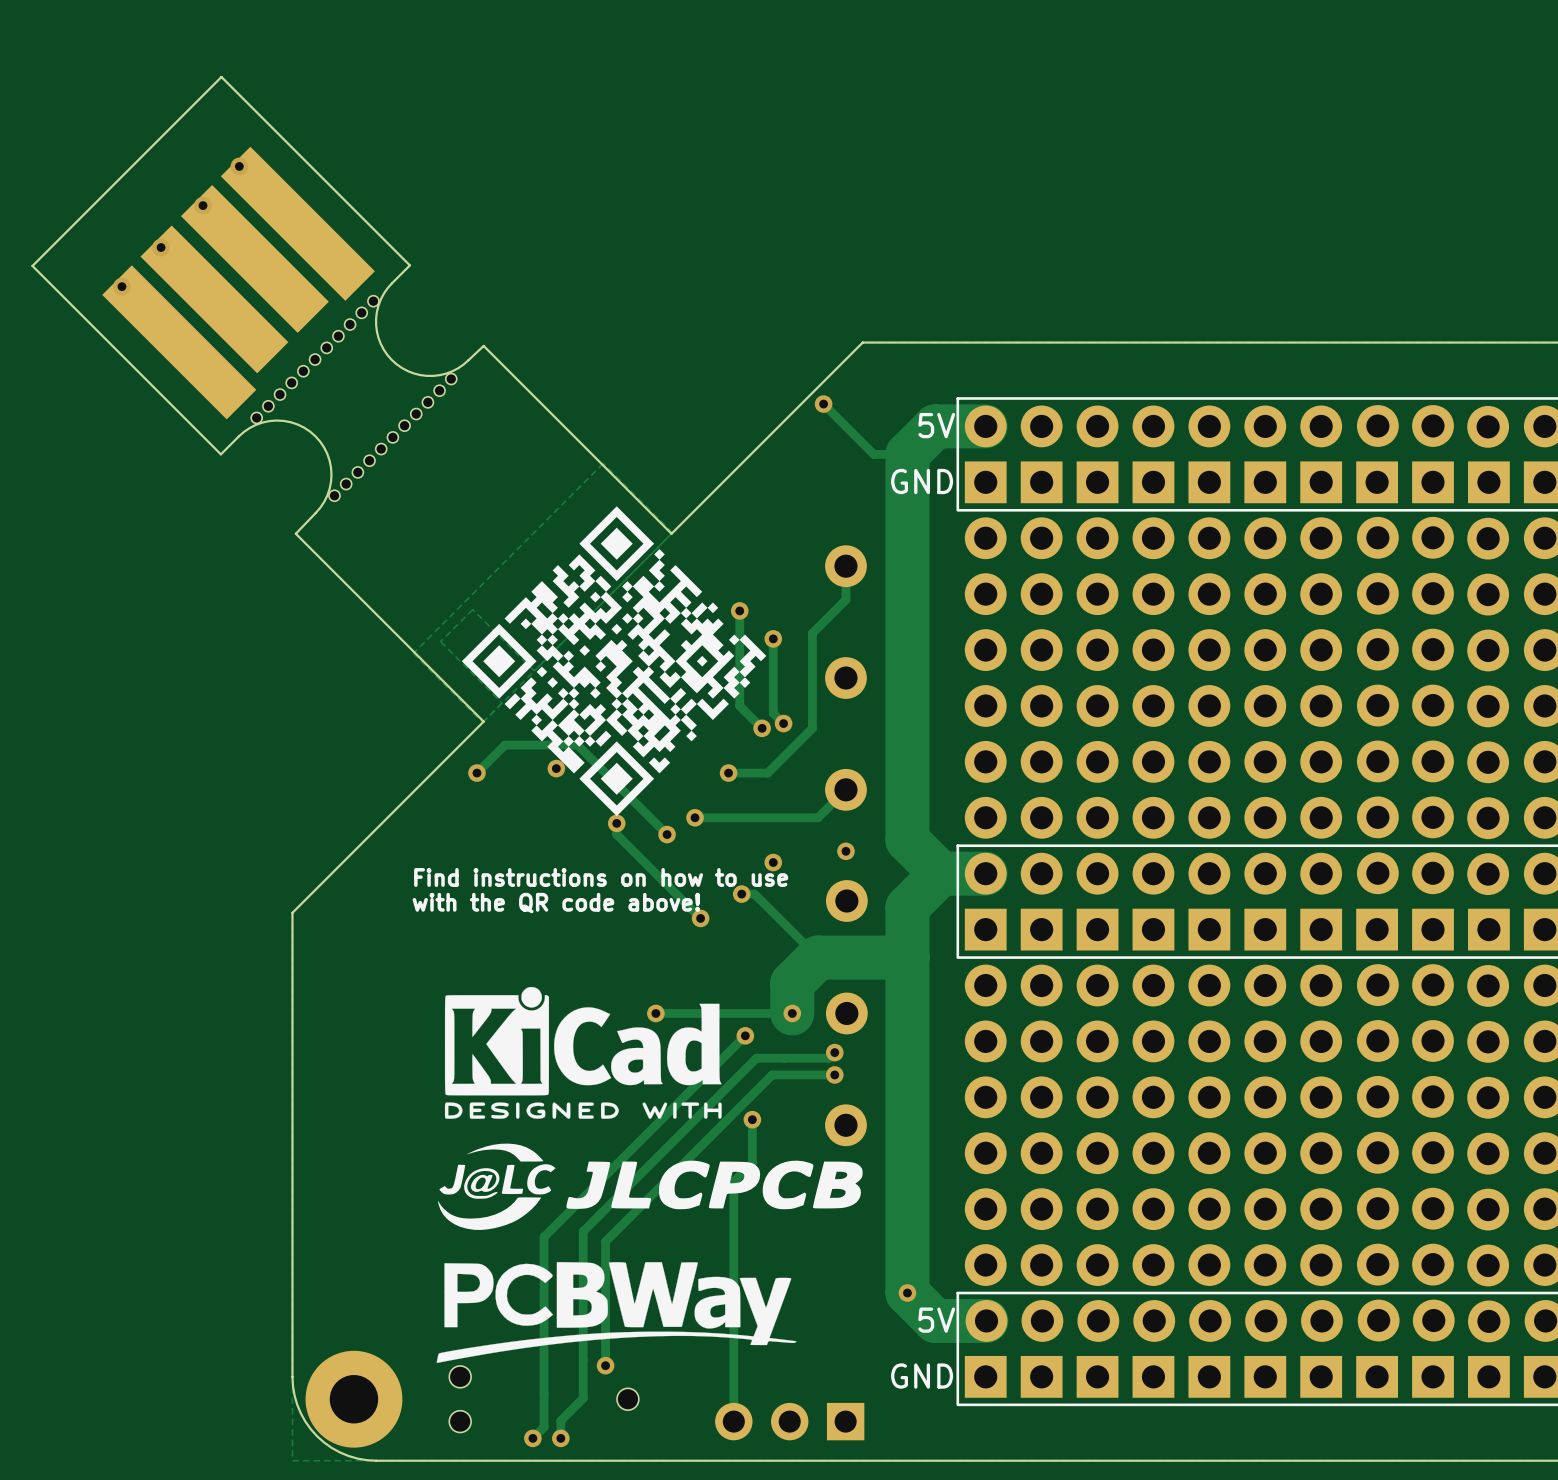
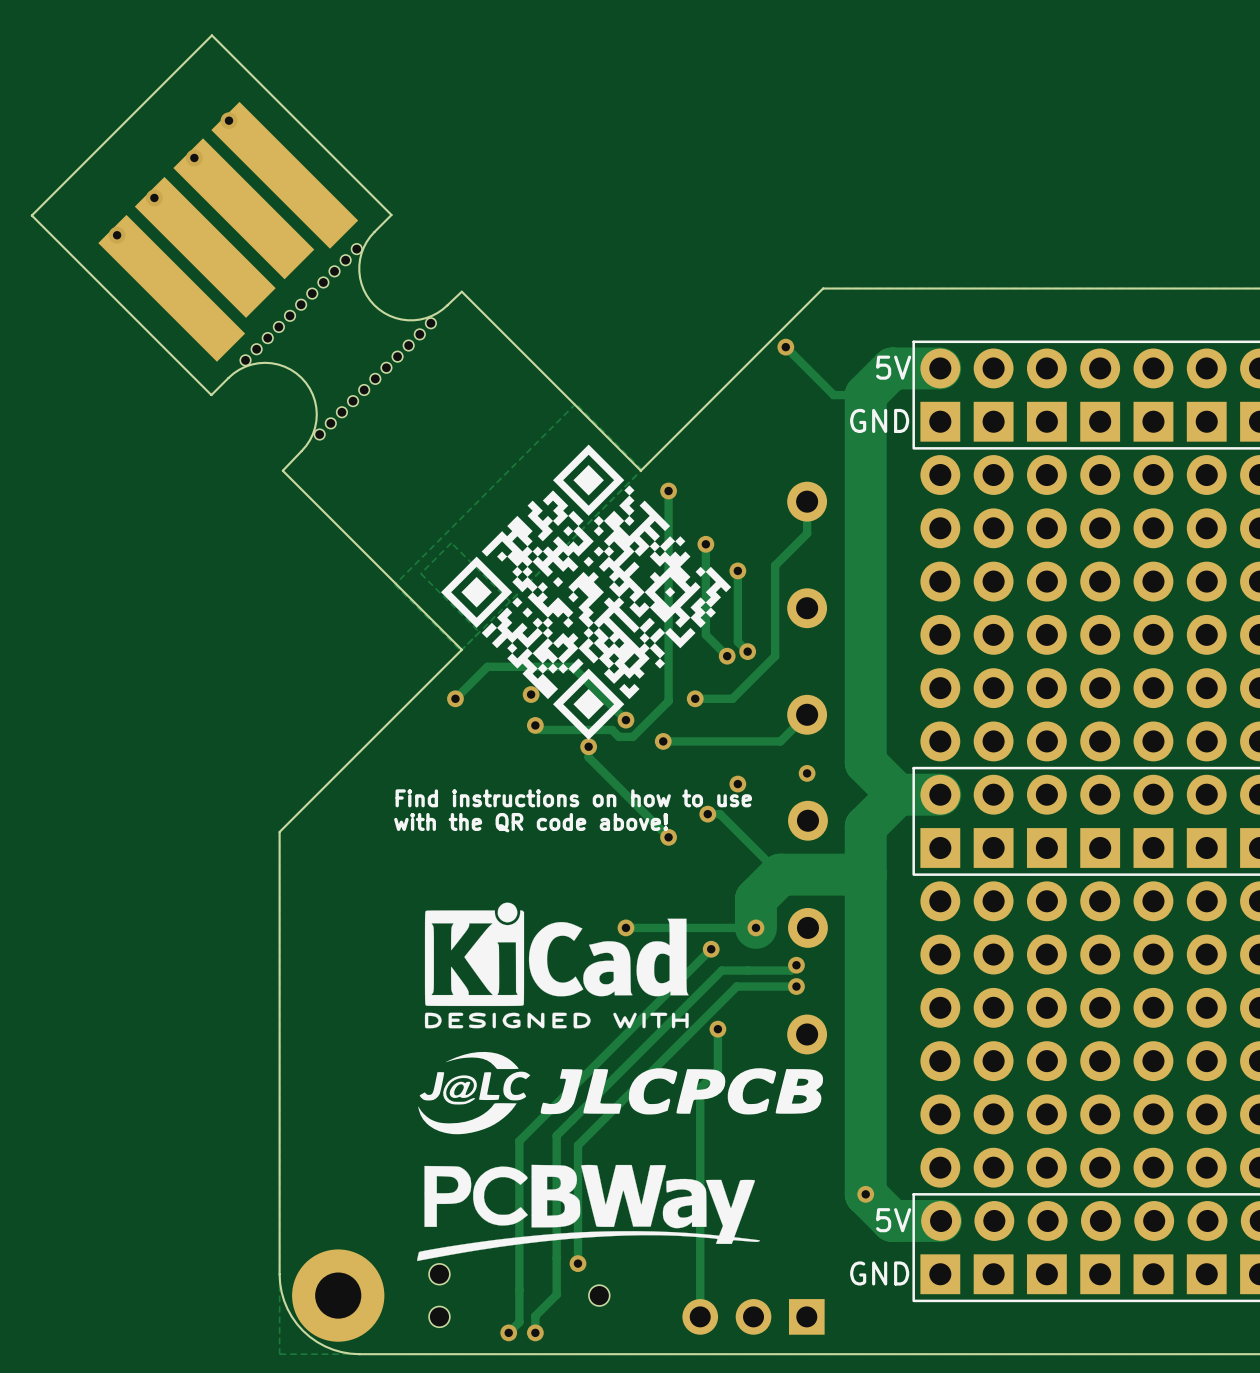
track: none -> (668, 491) (668, 701) (632, 736) (619, 736) (612, 729) (539, 729) (535, 725)
via: none -> (668, 491)
track: (504, 745) (577, 745) (667, 834) -> (482, 672) (487, 666) (572, 666) (625, 720)
via: none -> (535, 725)
via position: (667, 834) -> (625, 720)

